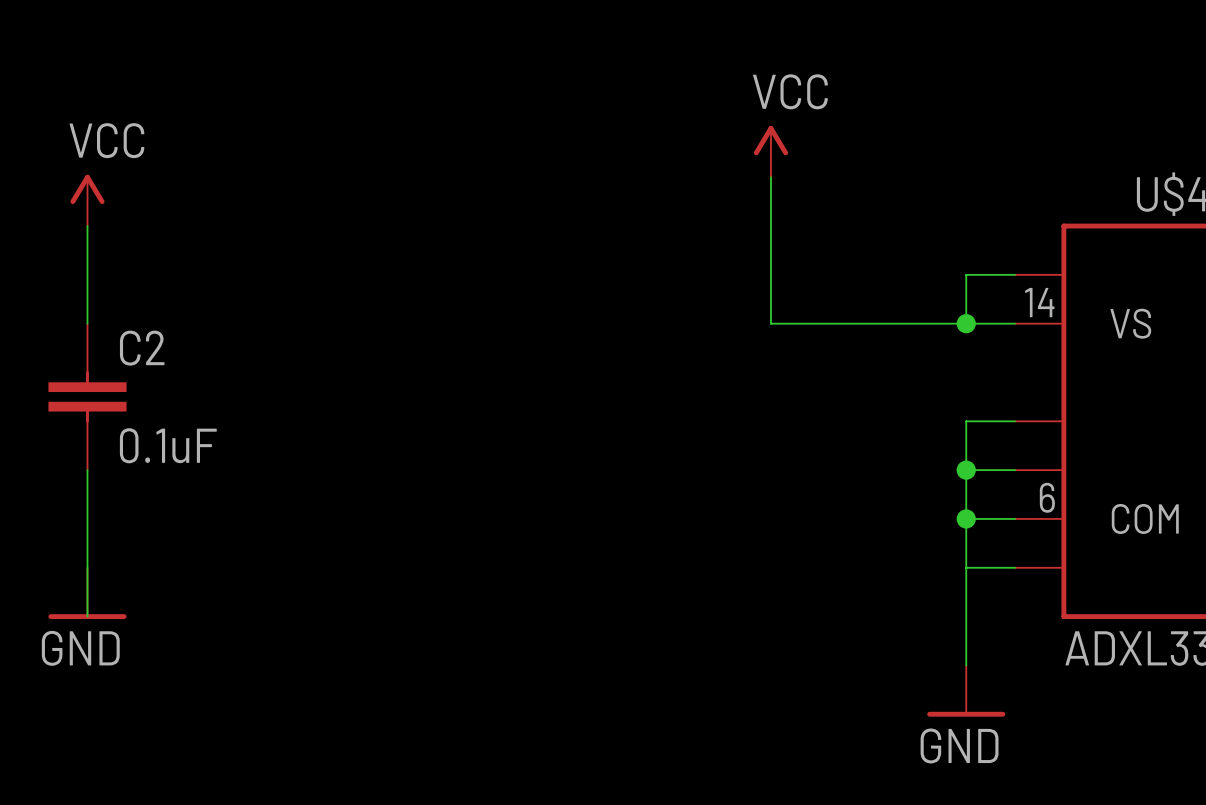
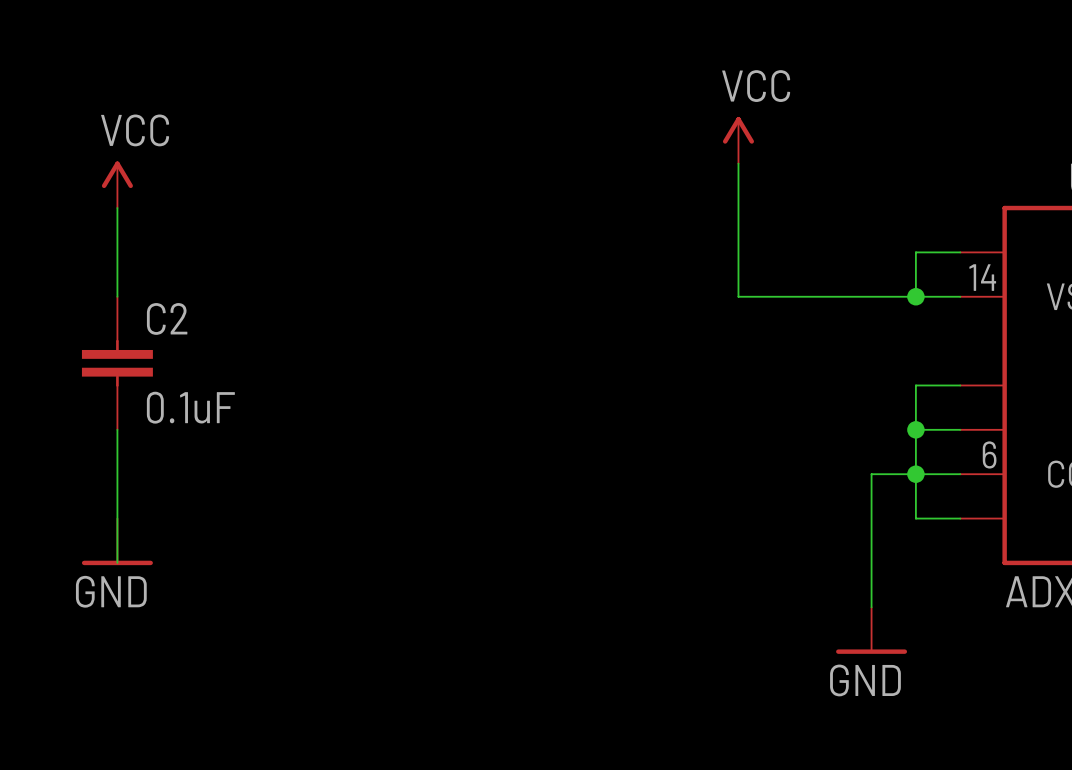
wire: none -> (915, 474) (871, 474) (871, 607)
wire: (966, 567) (966, 665) -> none
power symbol position: GND (966, 691) -> GND (871, 630)

